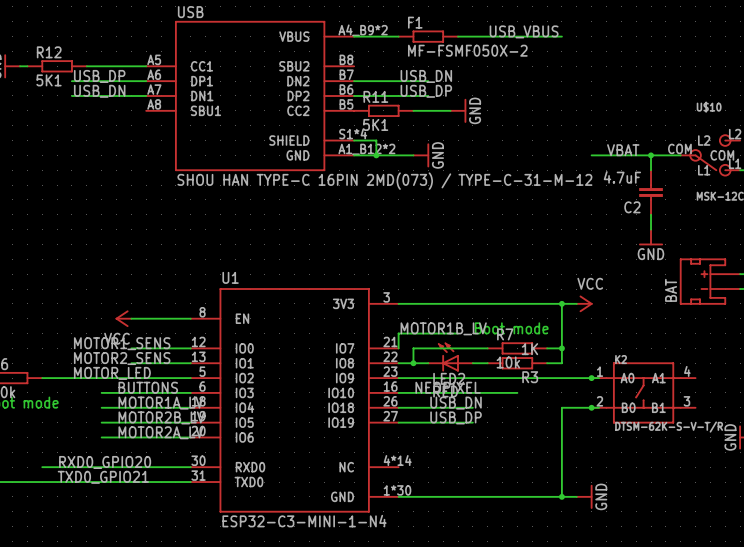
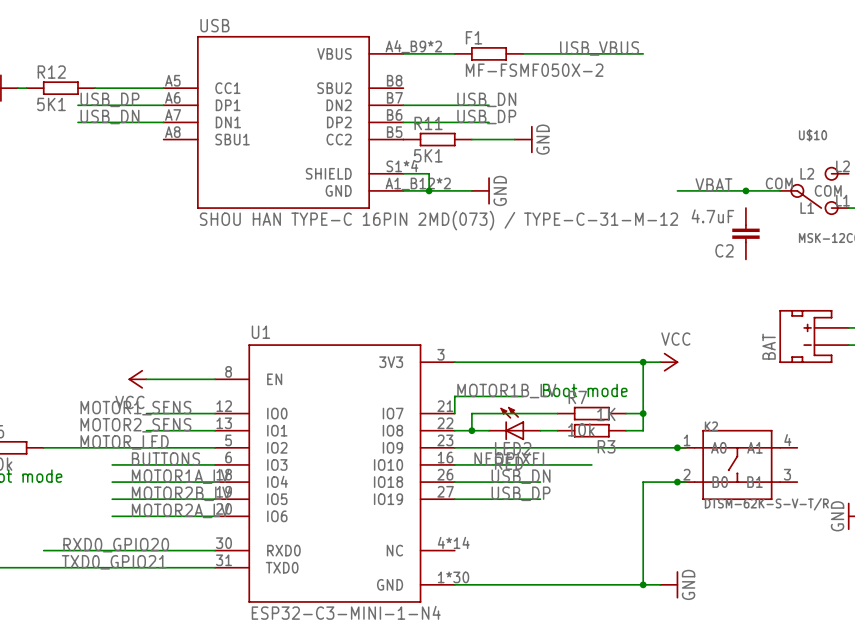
wire: (651, 155) (651, 170) -> none
wire: (651, 214) (651, 229) -> none
power symbol: GND (651, 237) -> none

